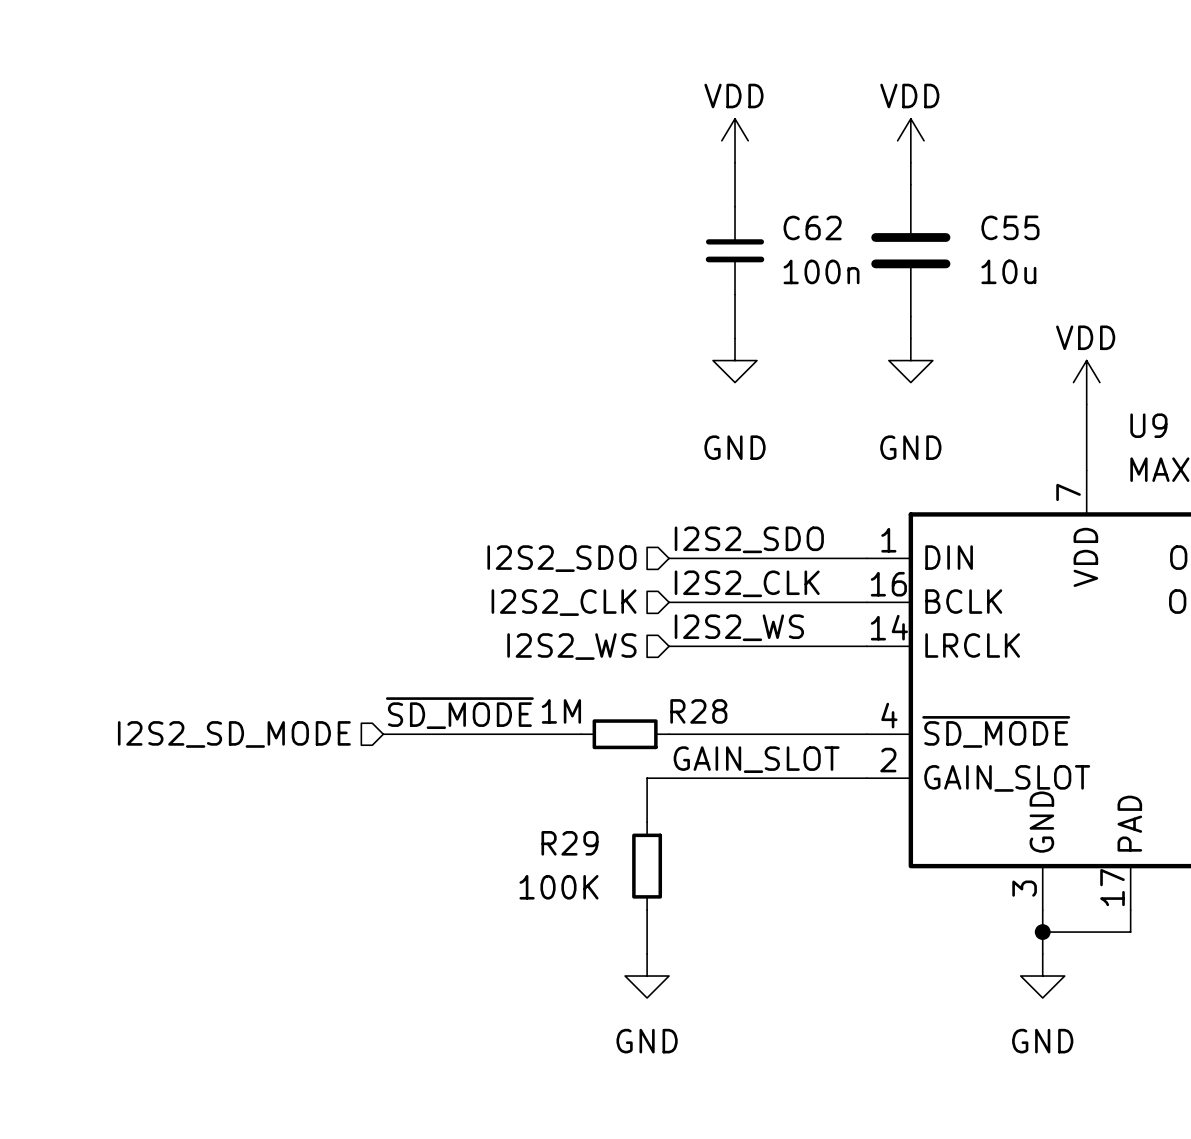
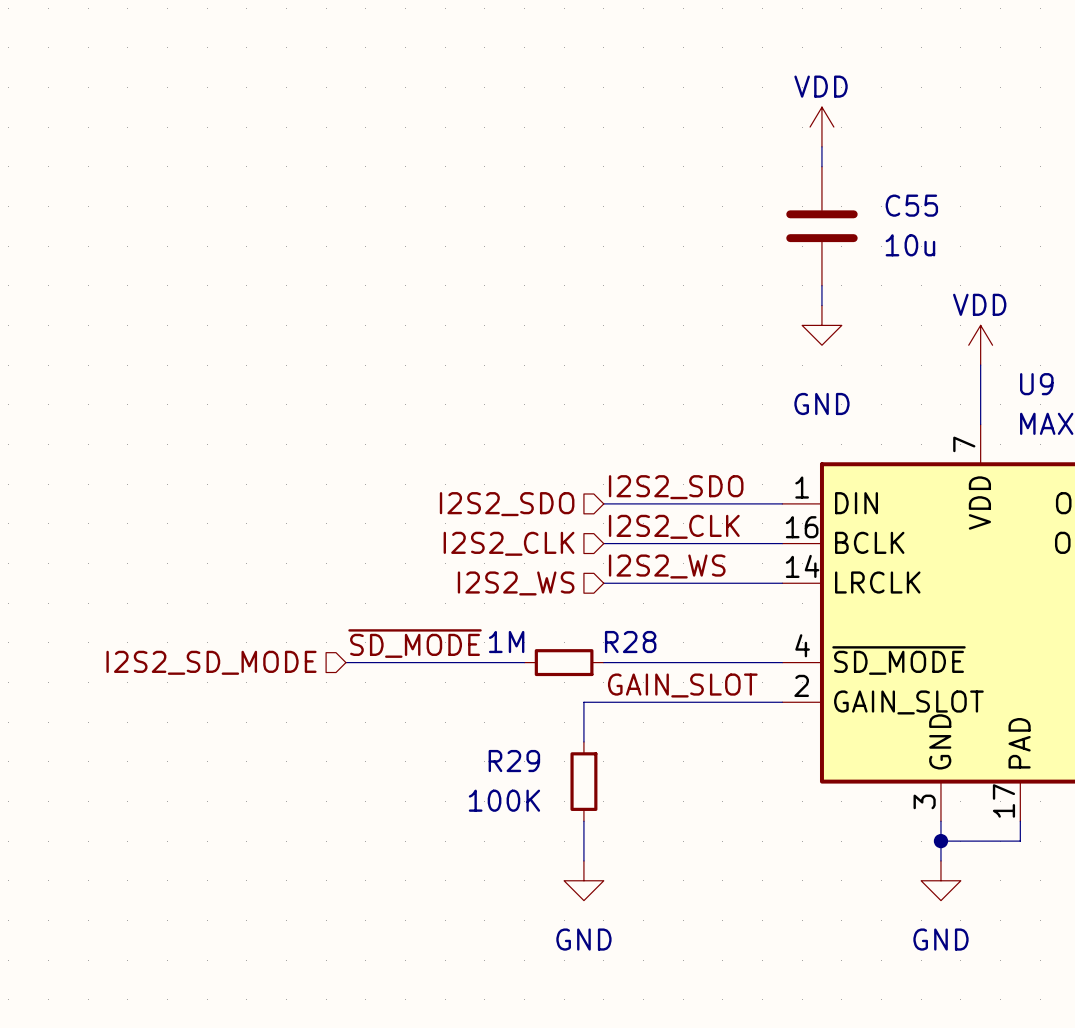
power symbol: VDD (735, 140) -> none
wire: (735, 162) (735, 206) -> none
C62: 100n (735, 250) -> none
wire: (735, 294) (735, 338) -> none
power symbol: GND (735, 360) -> none

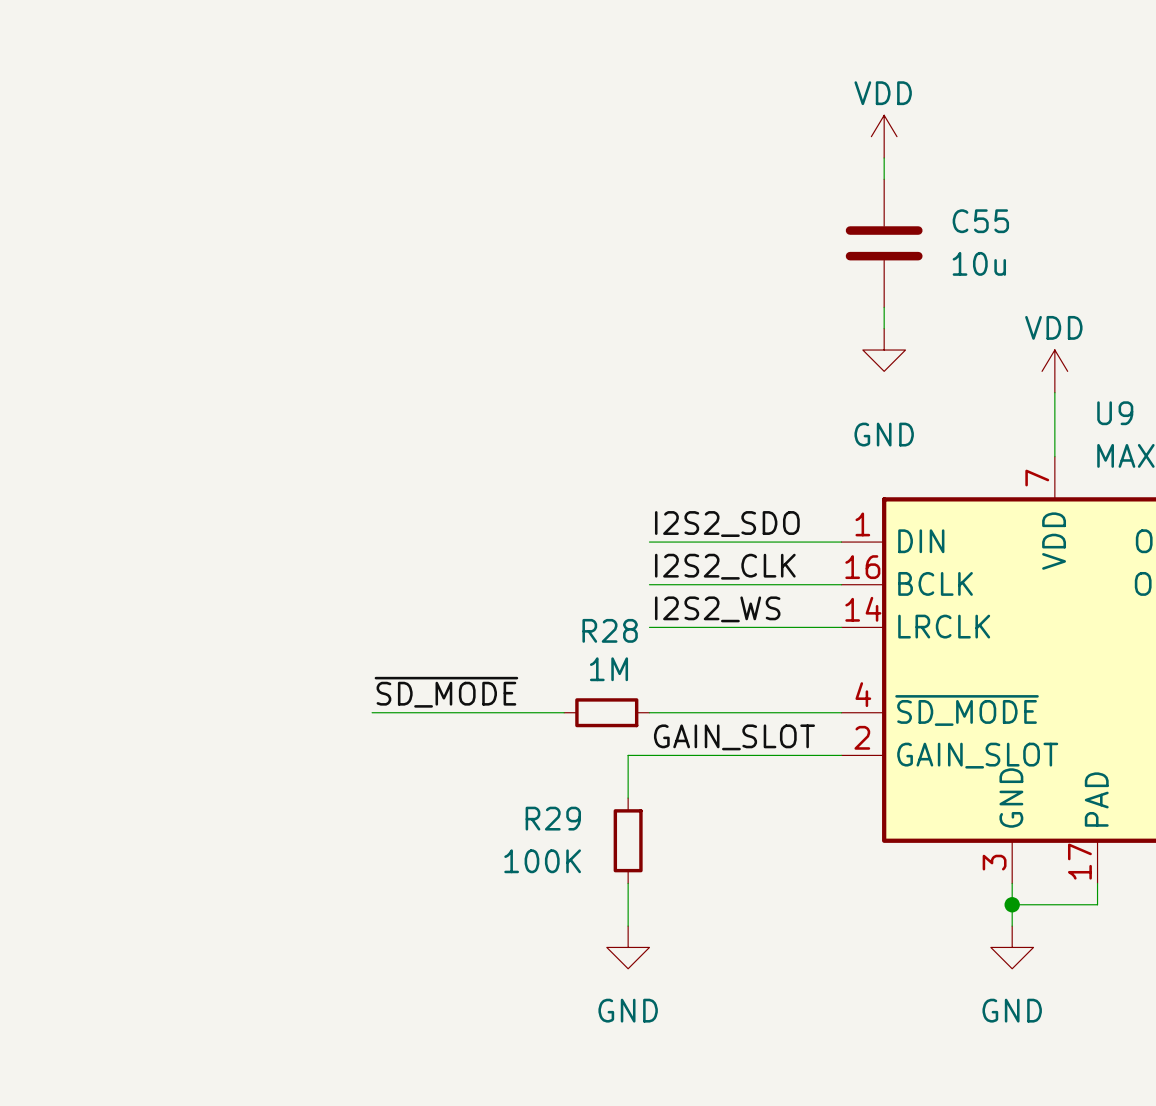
hierarchical label: I2S2_SDO (507, 504) -> none
hierarchical label: I2S2_CLK (509, 543) -> none
hierarchical label: I2S2_WS (516, 583) -> none
R28 value position: 1M (506, 642) -> 1M (608, 669)
R28 name position: R28 (630, 642) -> R28 (610, 630)
hierarchical label: I2S2_SD_MODE (211, 662) -> none

